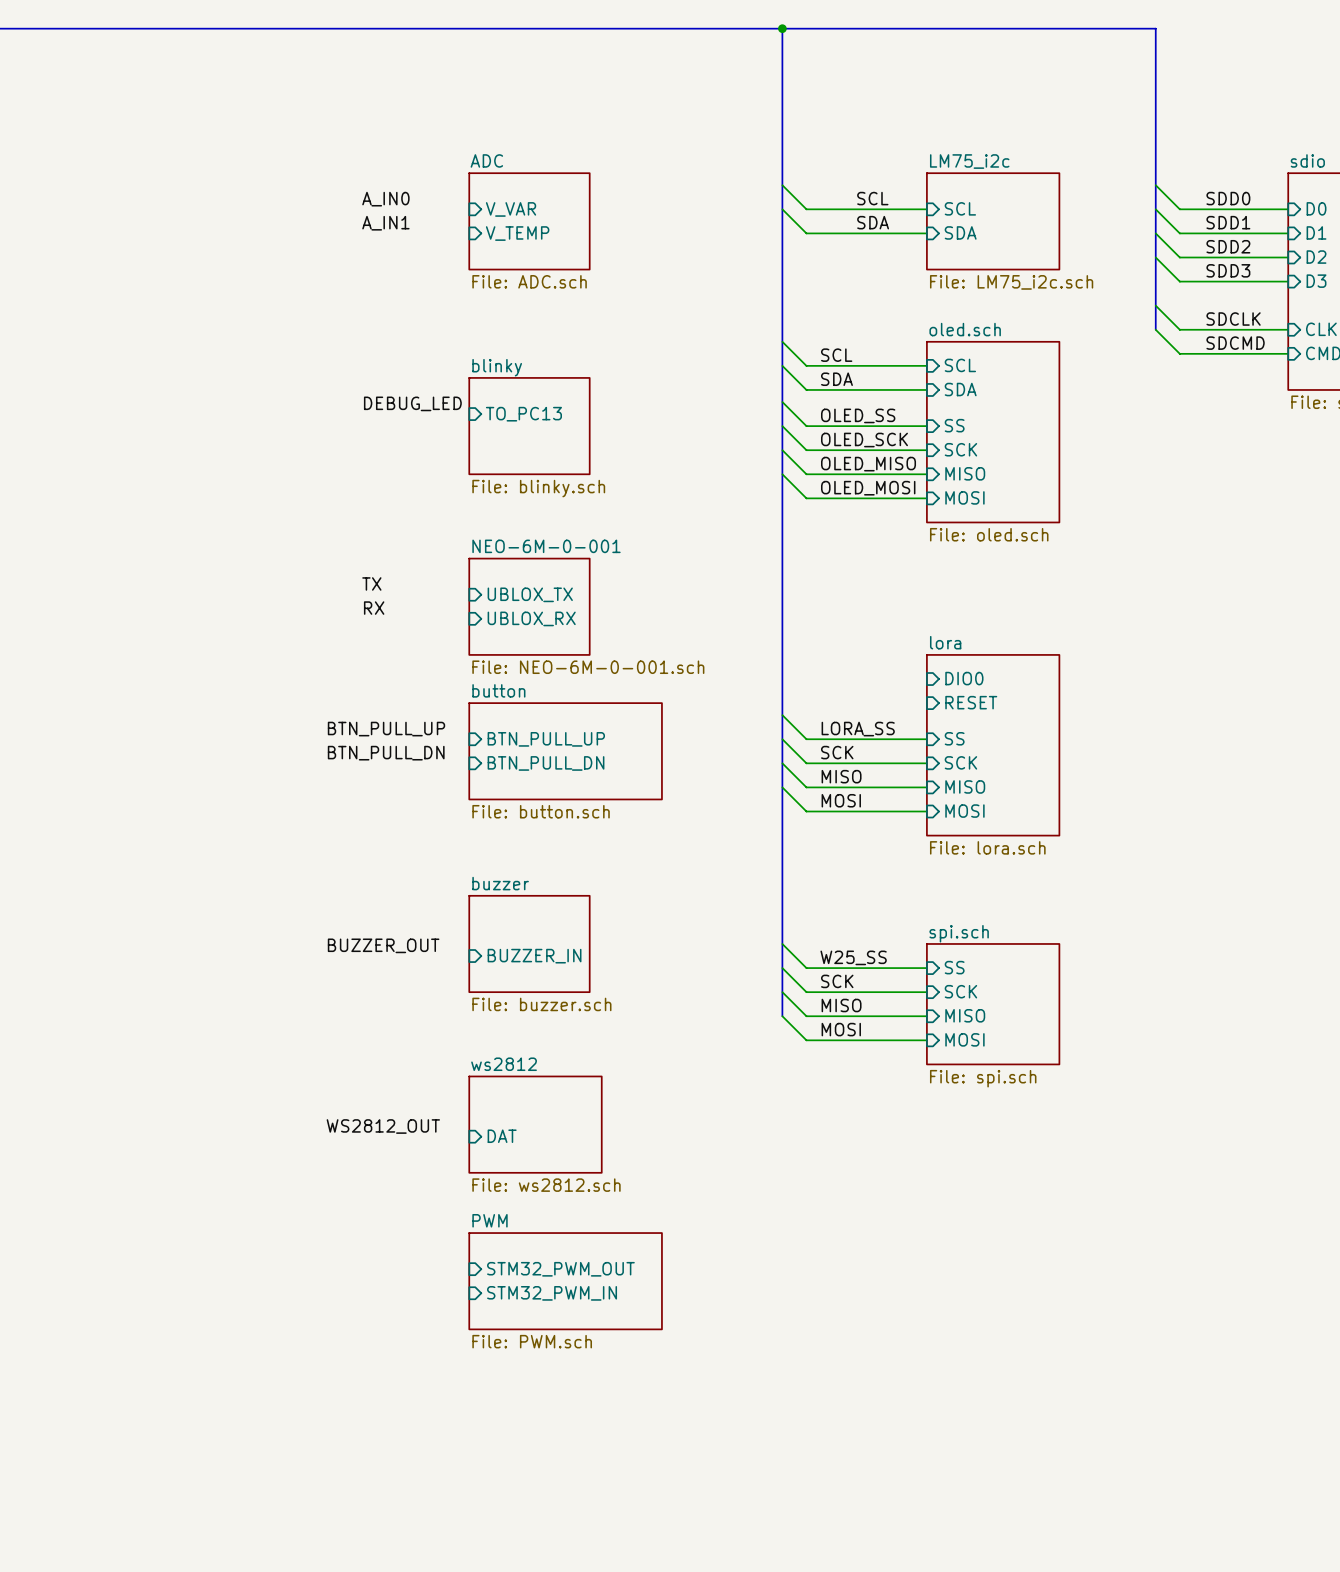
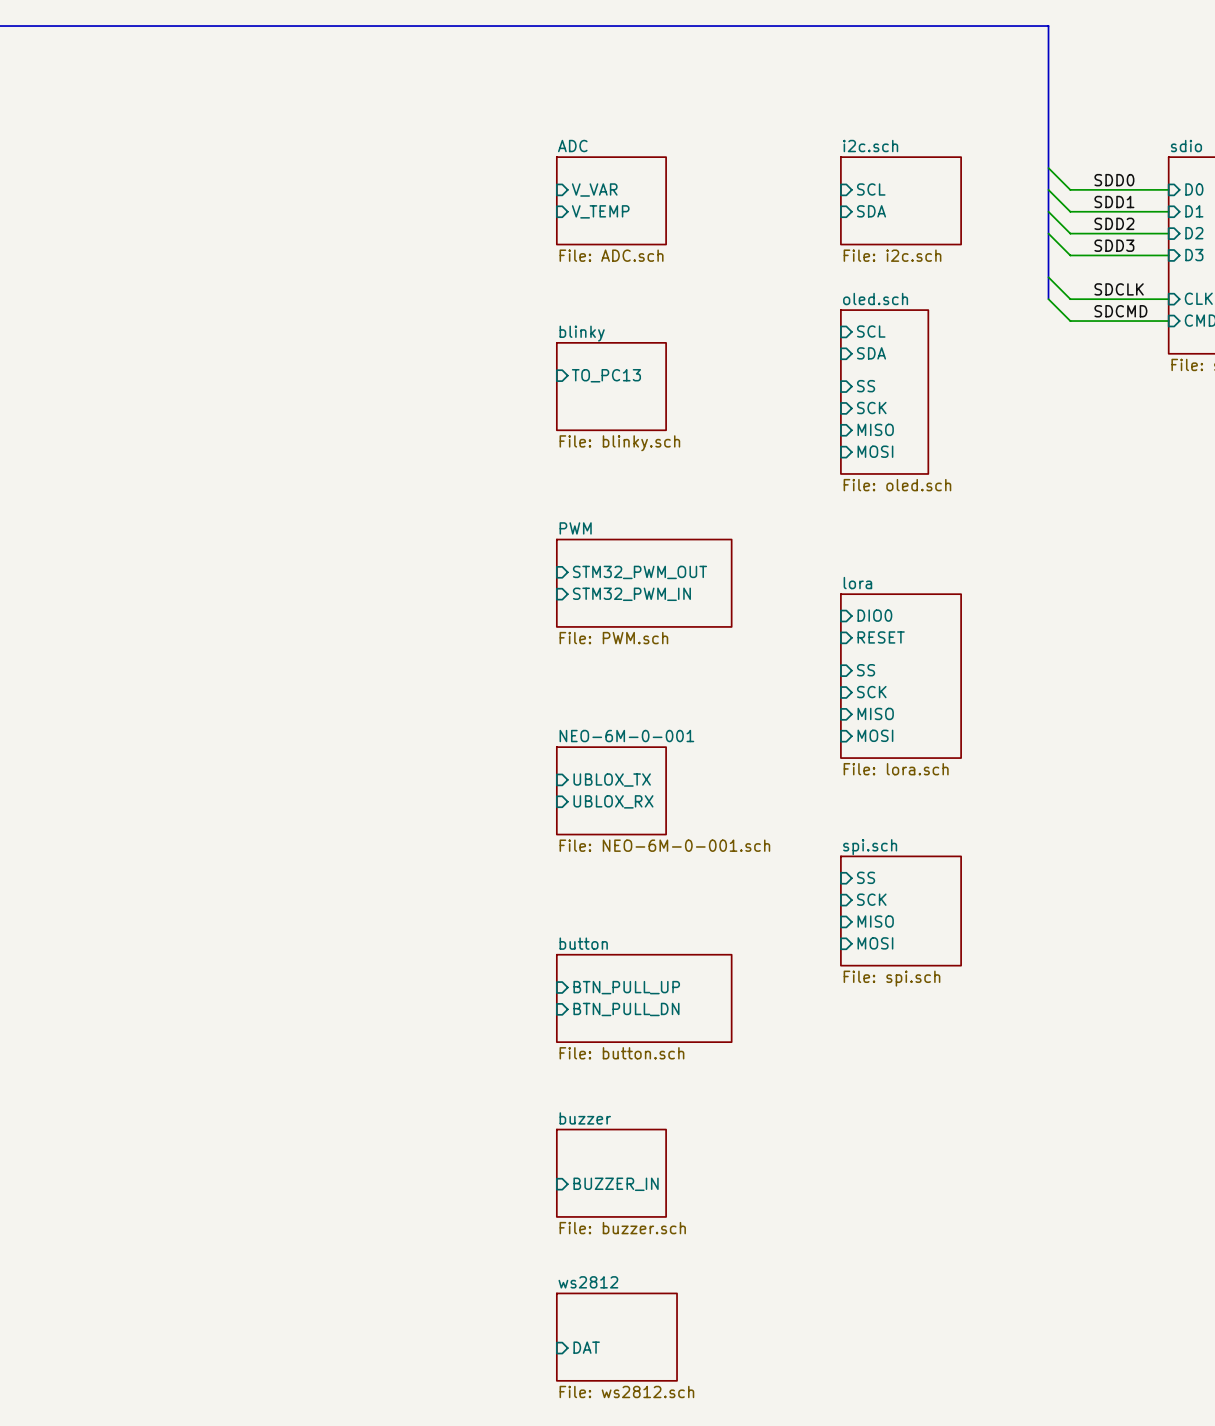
bus: (782, 28) (782, 1016) -> none
junction: (782, 28) -> none
sheet LM75_i2c name: LM75_i2c (969, 161) -> i2c.sch (870, 146)
wire: (782, 185) (806, 209) (926, 209) -> none
label: SCL (872, 198) -> none
label: A_IN0 (385, 199) -> none
sheet pin position: V_VAR (511, 209) -> V_VAR (594, 190)
wire: (782, 209) (806, 233) (926, 233) -> none
sheet ADC position: (529, 221) -> (611, 200)
label: SDA (873, 222) -> none
label: A_IN1 (385, 223) -> none
sheet pin position: V_TEMP (517, 233) -> V_TEMP (600, 211)
sheet LM75_i2c value: File: LM75_i2c.sch (1011, 282) -> File: i2c.sch (892, 255)
wire: (782, 341) (806, 365) (926, 365) -> none
label: SCL (836, 355) -> none
wire: (782, 365) (806, 389) (926, 389) -> none
label: SDA (836, 379) -> none
wire: (782, 402) (806, 426) (926, 426) -> none
label: DEBUG_LED (412, 403) -> none
sheet pin position: TO_PC13 (523, 414) -> TO_PC13 (606, 375)
label: OLED_SS (858, 415) -> none
sheet blinky position: (529, 426) -> (611, 386)
wire: (782, 426) (806, 450) (926, 450) -> none
sheet oled.sch: none -> File: oled.sch (884, 392)
sheet oled.sch: File: oled.sch (993, 432) -> none
label: OLED_SCK (864, 440) -> none
wire: (782, 450) (806, 474) (926, 474) -> none
label: OLED_MISO (868, 464) -> none
wire: (782, 474) (806, 498) (926, 498) -> none
label: OLED_MOSI (868, 488) -> none
label: TX (371, 583) -> none
sheet pin: UBLOX_TX (530, 594) -> none
sheet NEO-6M-0-001 position: (529, 606) -> (611, 790)
label: RX (374, 608) -> none
sheet pin: UBLOX_RX (531, 618) -> none
sheet pin: none -> STM32_PWM_OUT (639, 572)
sheet PWM: none -> File: PWM.sch (644, 583)
sheet pin: none -> STM32_PWM_IN (631, 594)
wire: (782, 715) (806, 739) (926, 739) -> none
label: BTN_PULL_UP (386, 729) -> none
label: LORA_SS (858, 729) -> none
sheet pin: BTN_PULL_UP (546, 739) -> none
wire: (782, 739) (806, 763) (926, 763) -> none
sheet button: File: button.sch (565, 751) -> none
label: SCK (837, 752) -> none
label: BTN_PULL_DN (386, 753) -> none
sheet pin: BTN_PULL_DN (546, 763) -> none
wire: (782, 763) (806, 787) (926, 787) -> none
label: MISO (841, 776) -> none
wire: (782, 787) (806, 811) (926, 811) -> none
label: MOSI (841, 800) -> none
sheet pin: none -> UBLOX_TX (612, 780)
sheet pin: none -> UBLOX_RX (613, 801)
sheet buzzer: File: buzzer.sch (529, 943) -> none
wire: (782, 943) (806, 968) (926, 968) -> none
label: BUZZER_OUT (383, 945) -> none
sheet pin: BUZZER_IN (534, 956) -> none
label: W25_SS (853, 957) -> none
wire: (782, 968) (806, 992) (926, 992) -> none
label: SCK (837, 981) -> none
wire: (782, 992) (806, 1016) (926, 1016) -> none
label: MISO (841, 1005) -> none
wire: (782, 1016) (806, 1040) (926, 1040) -> none
label: MOSI (841, 1029) -> none
sheet pin: none -> BTN_PULL_UP (626, 987)
sheet button: none -> File: button.sch (644, 998)
sheet pin: none -> BTN_PULL_DN (626, 1009)
sheet ws2812 position: (535, 1124) -> (616, 1337)
label: WS2812_OUT (383, 1126) -> none
sheet pin: DAT (502, 1136) -> none
sheet pin: STM32_PWM_OUT (560, 1269) -> none
sheet PWM: File: PWM.sch (565, 1281) -> none
sheet pin: STM32_PWM_IN (552, 1293) -> none
sheet buzzer: none -> File: buzzer.sch (611, 1173)
sheet pin: none -> BUZZER_IN (616, 1184)
sheet pin: none -> DAT (586, 1347)

